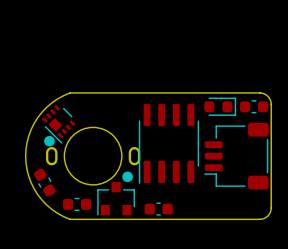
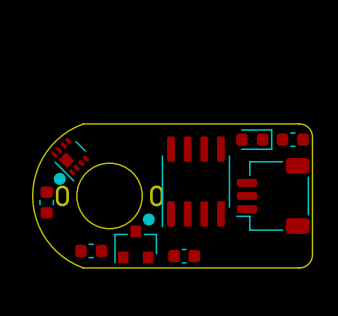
part: none -> (46, 202)
part: (44, 182) -> none

